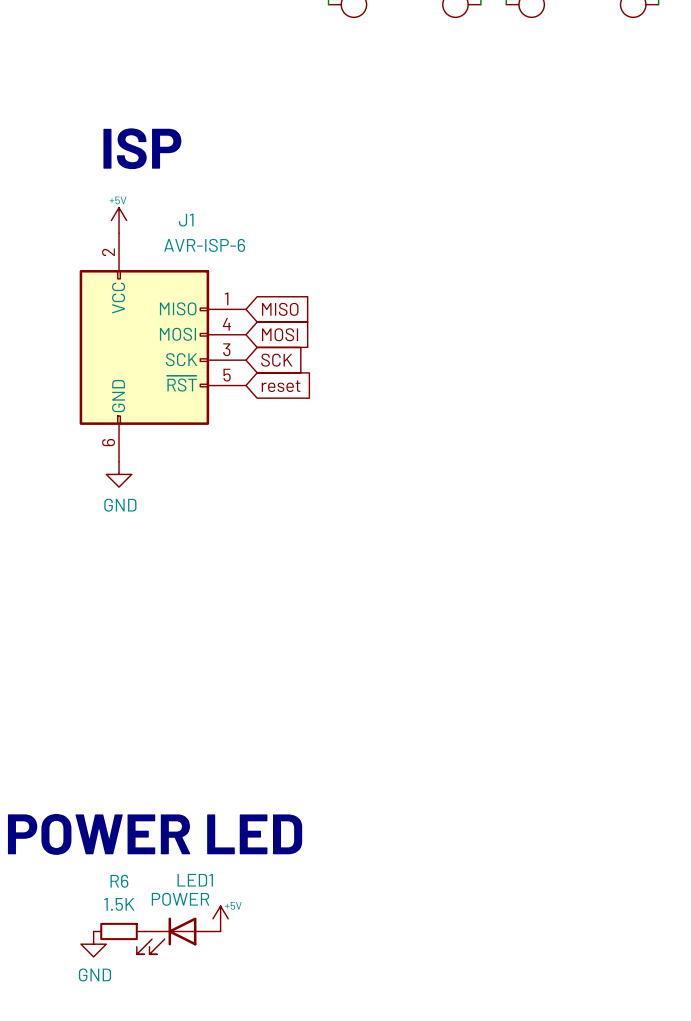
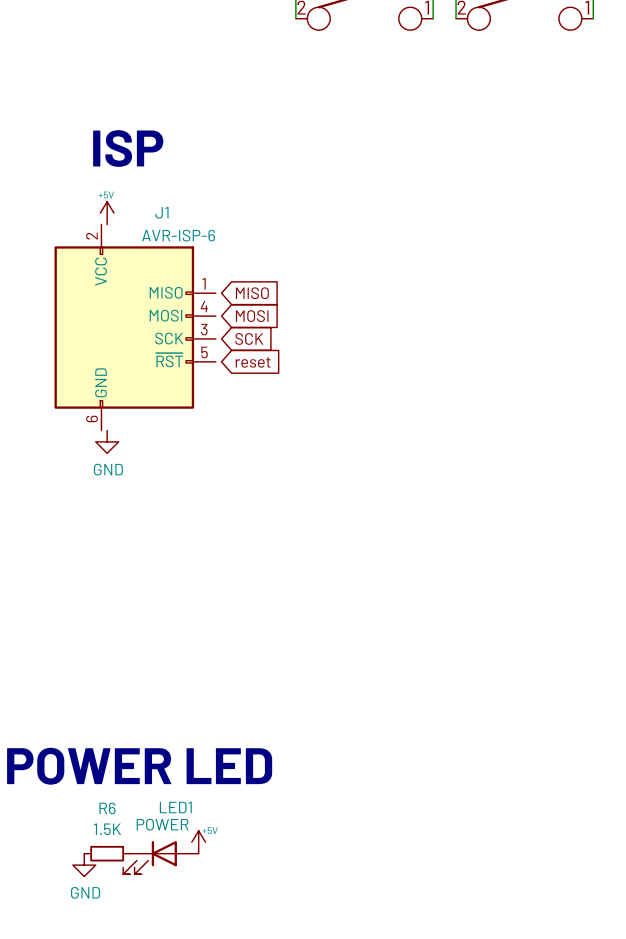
J1 symbol: [79, 233, 246, 462] -> [54, 224, 216, 431]

